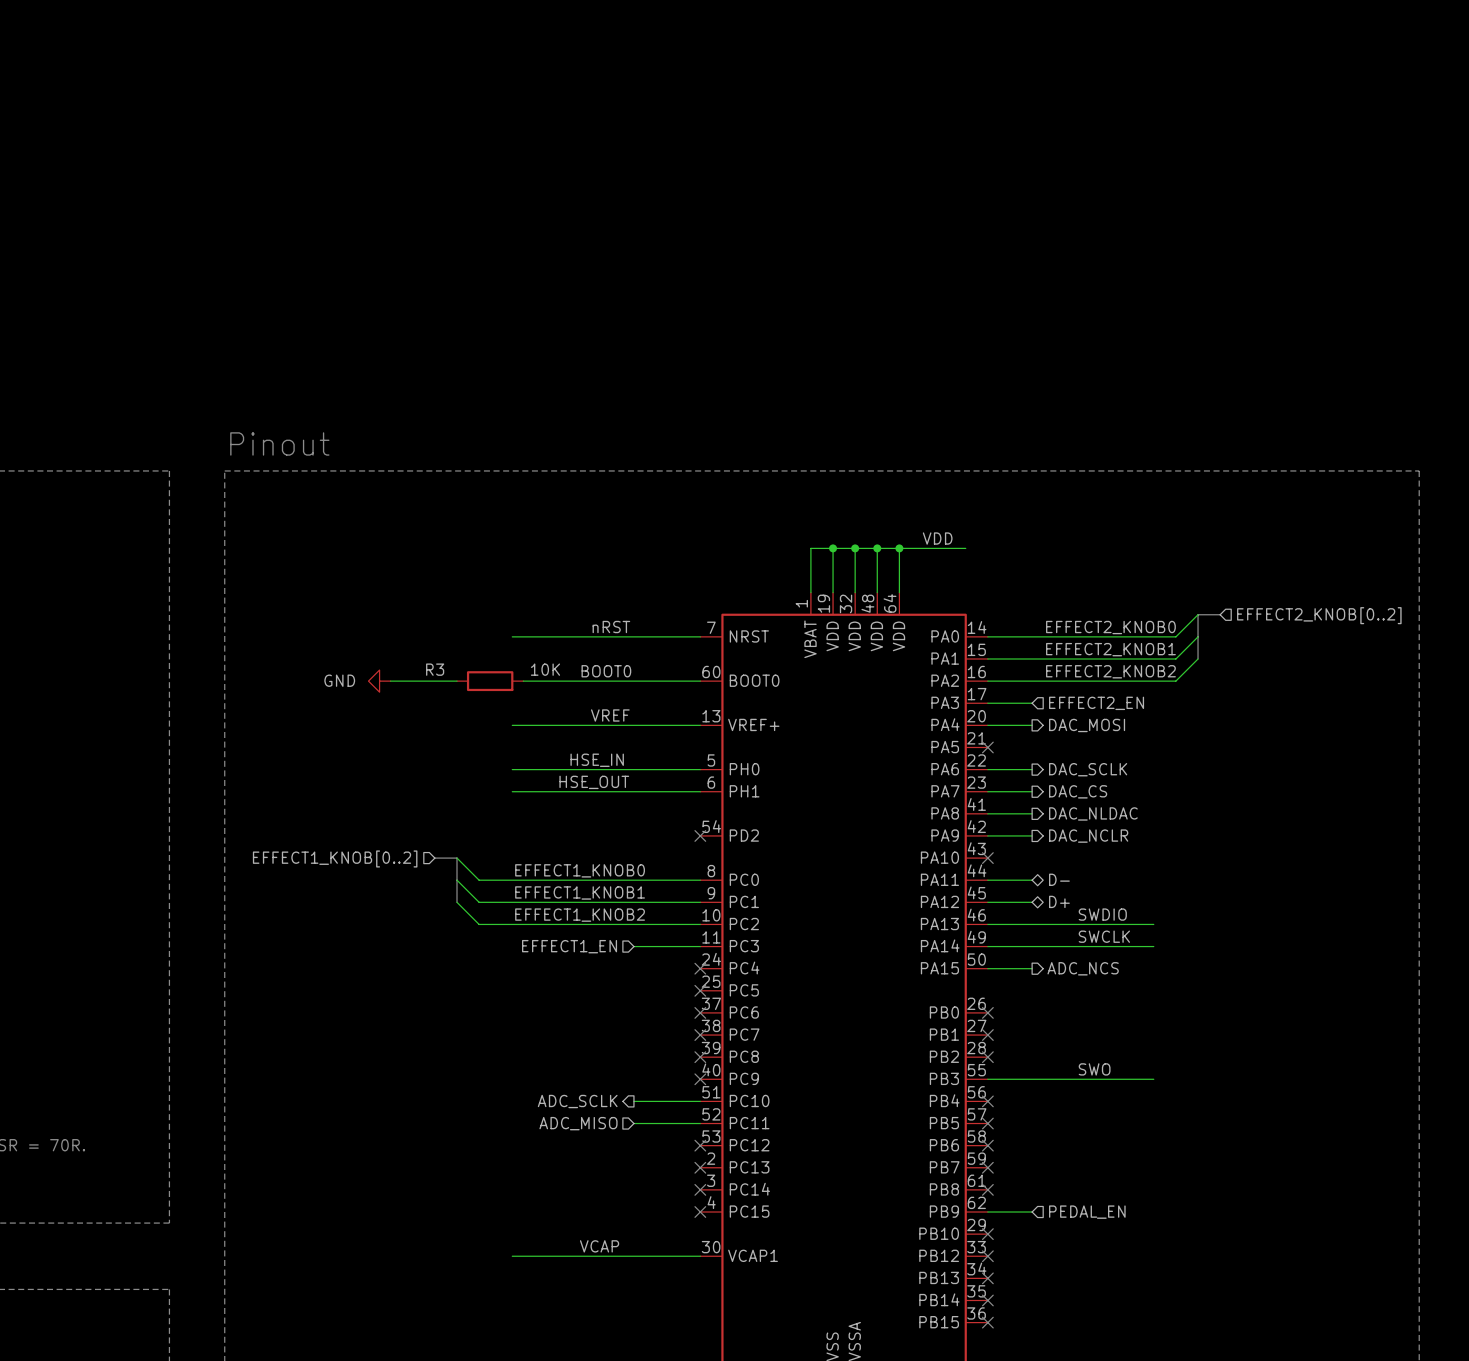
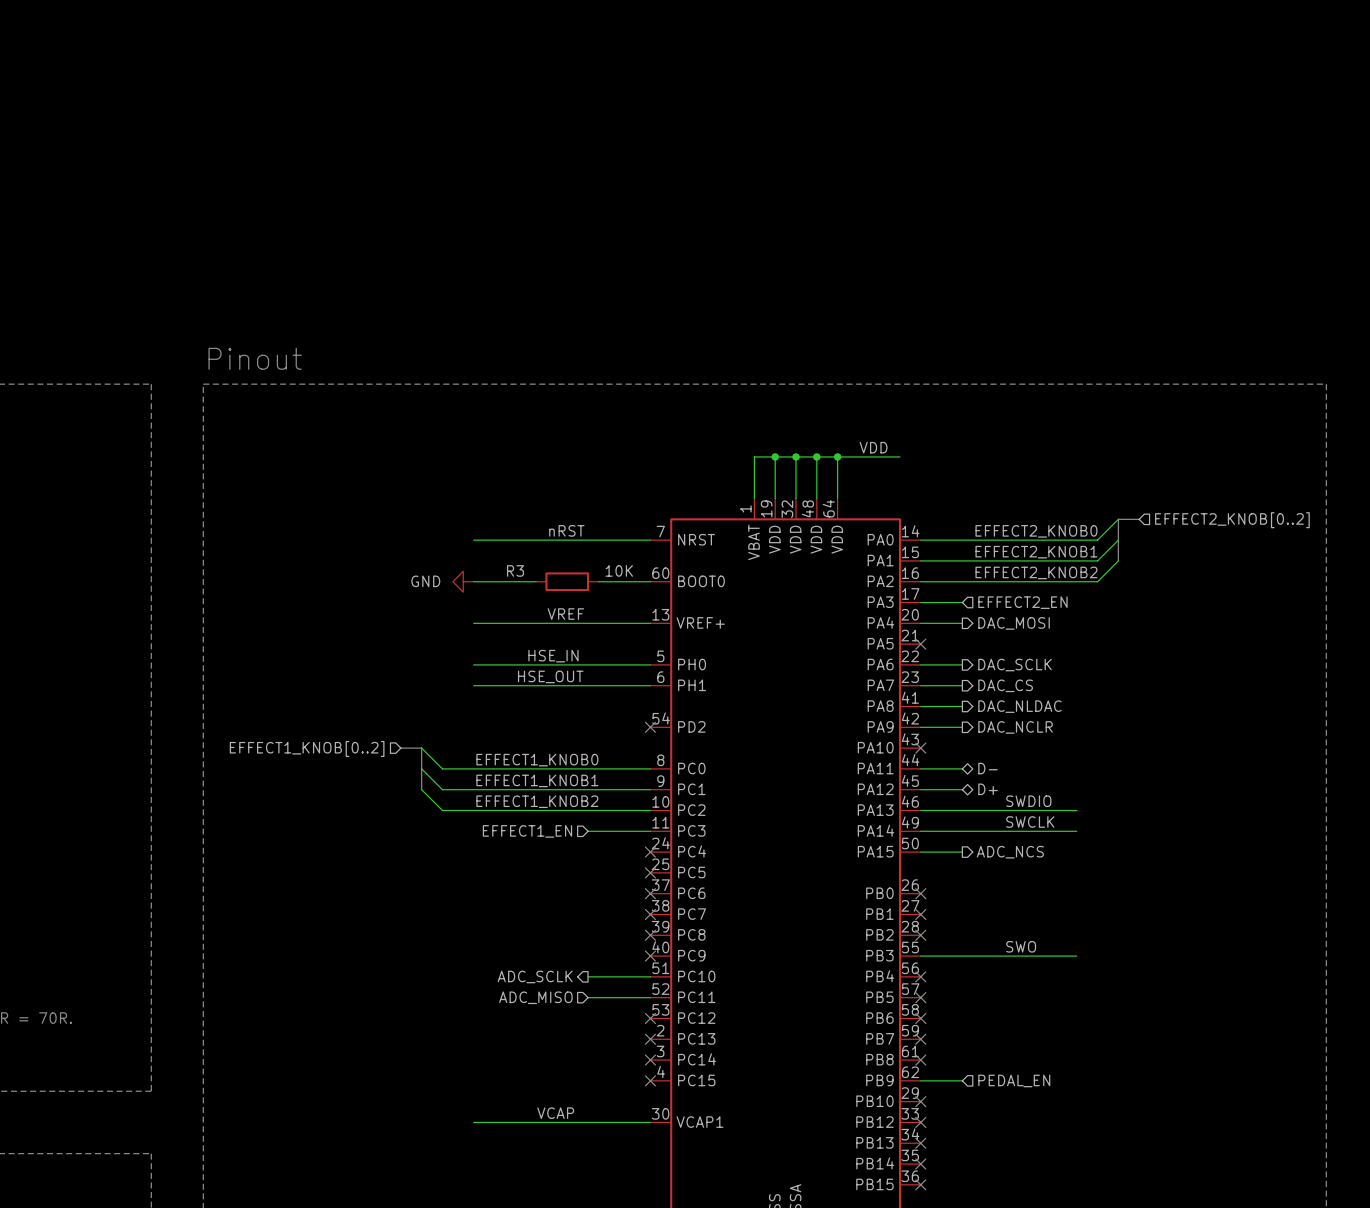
label: BOOT0 (606, 671) -> none
power symbol position: GND (379, 681) -> GND (463, 581)
wire: (390, 681) (456, 681) -> none
R3 position: (490, 681) -> (567, 581)
wire: (578, 681) (645, 681) -> none

